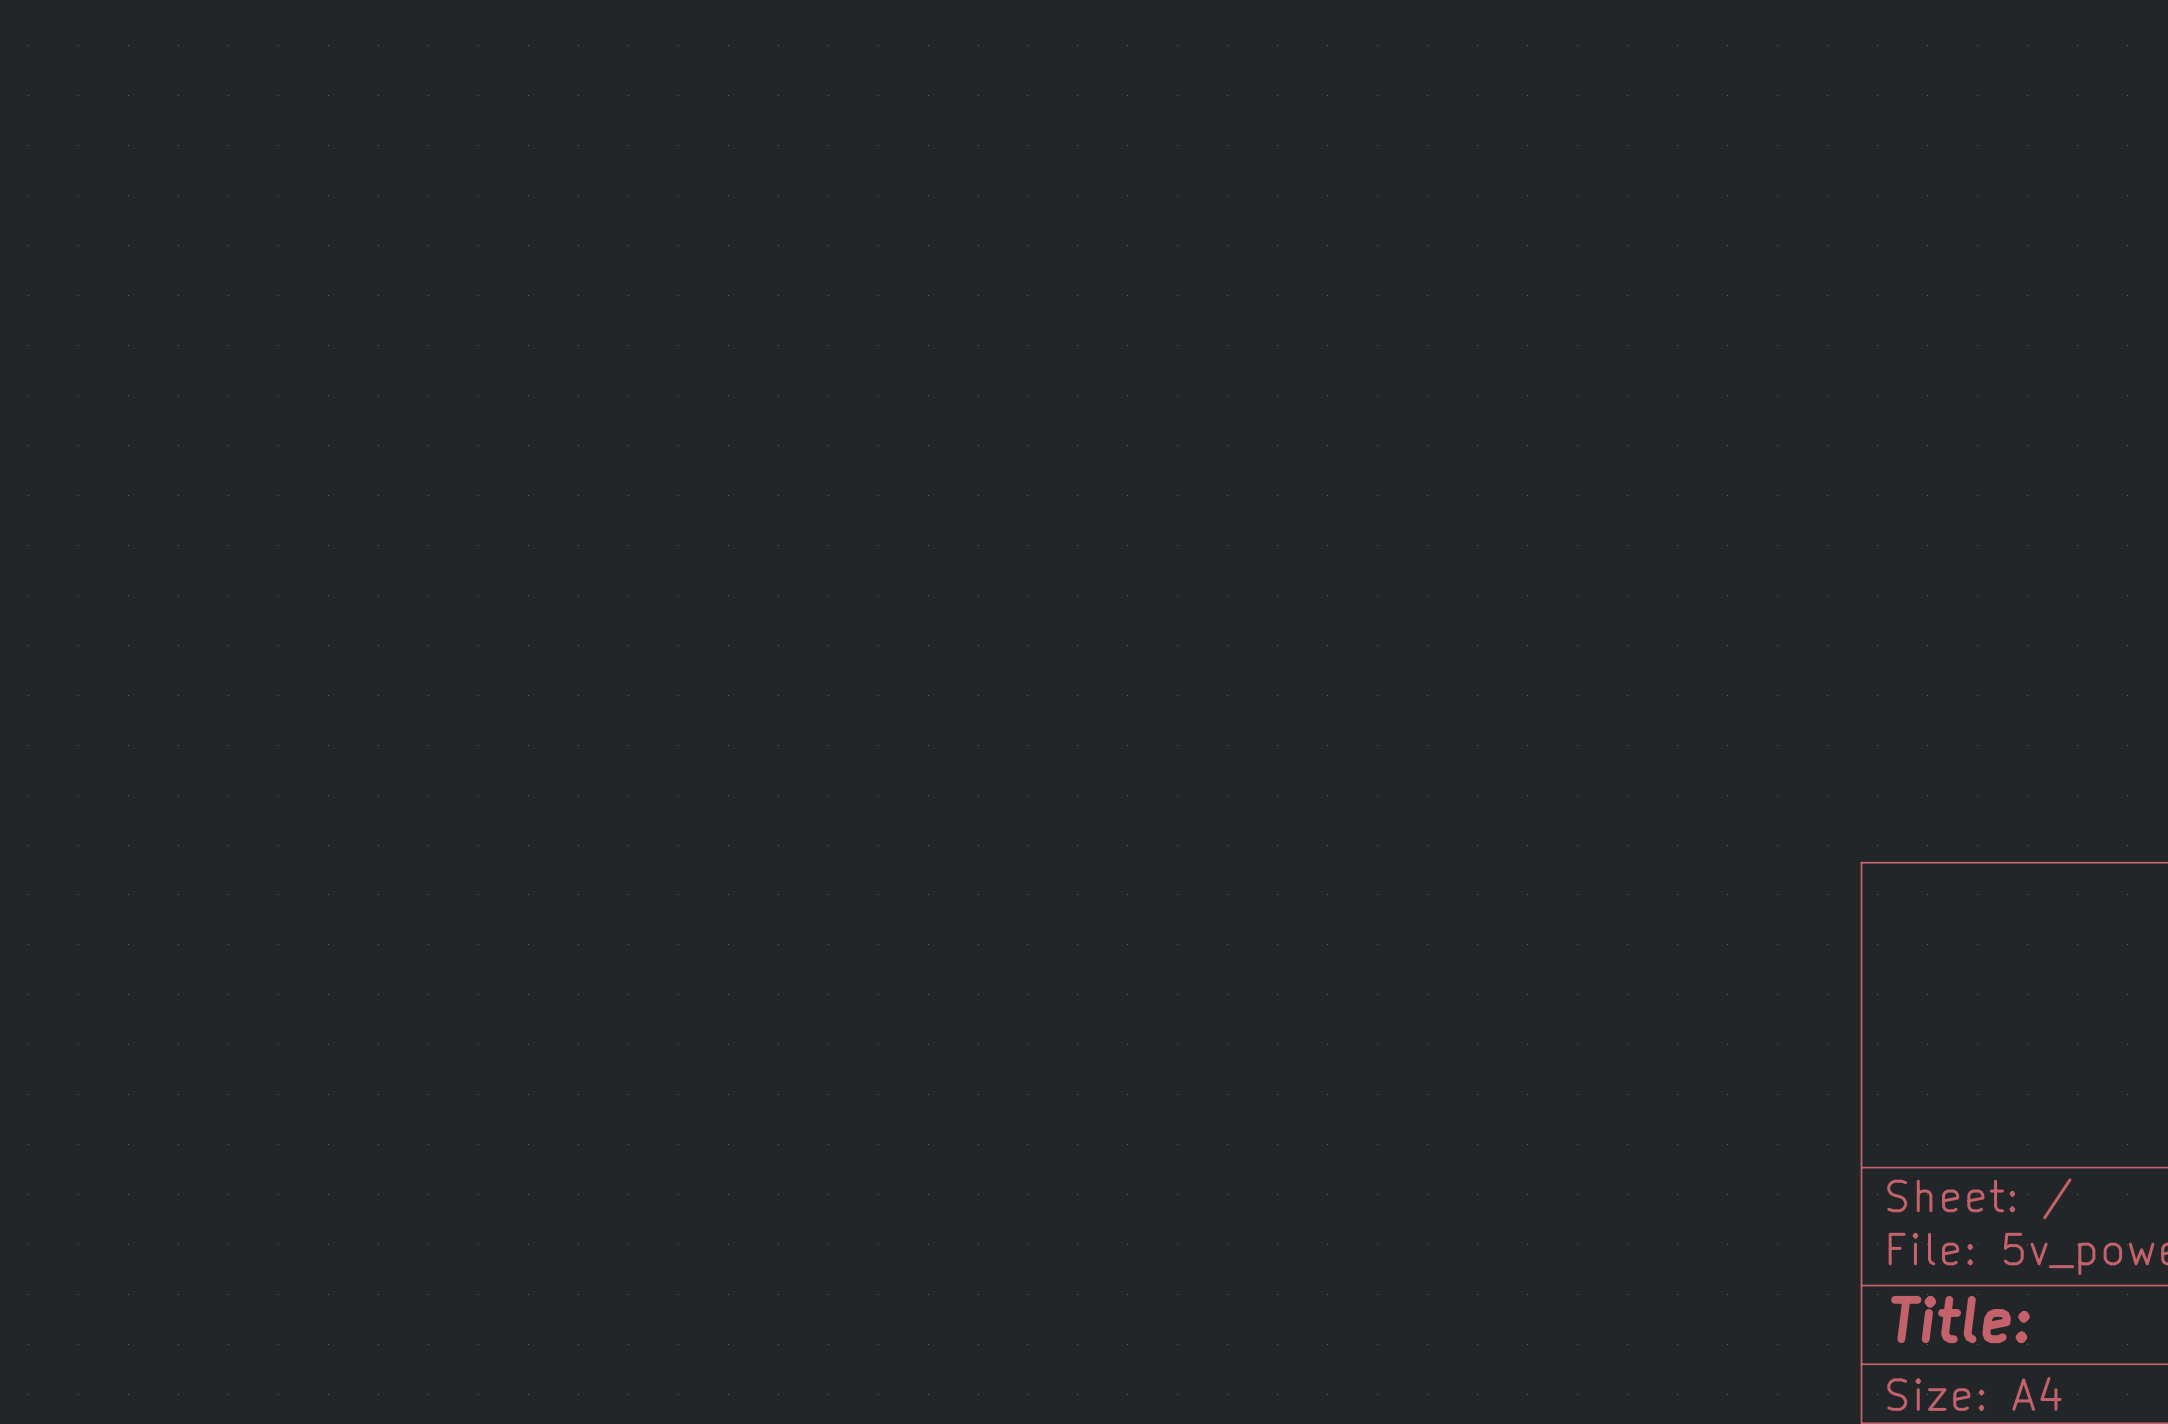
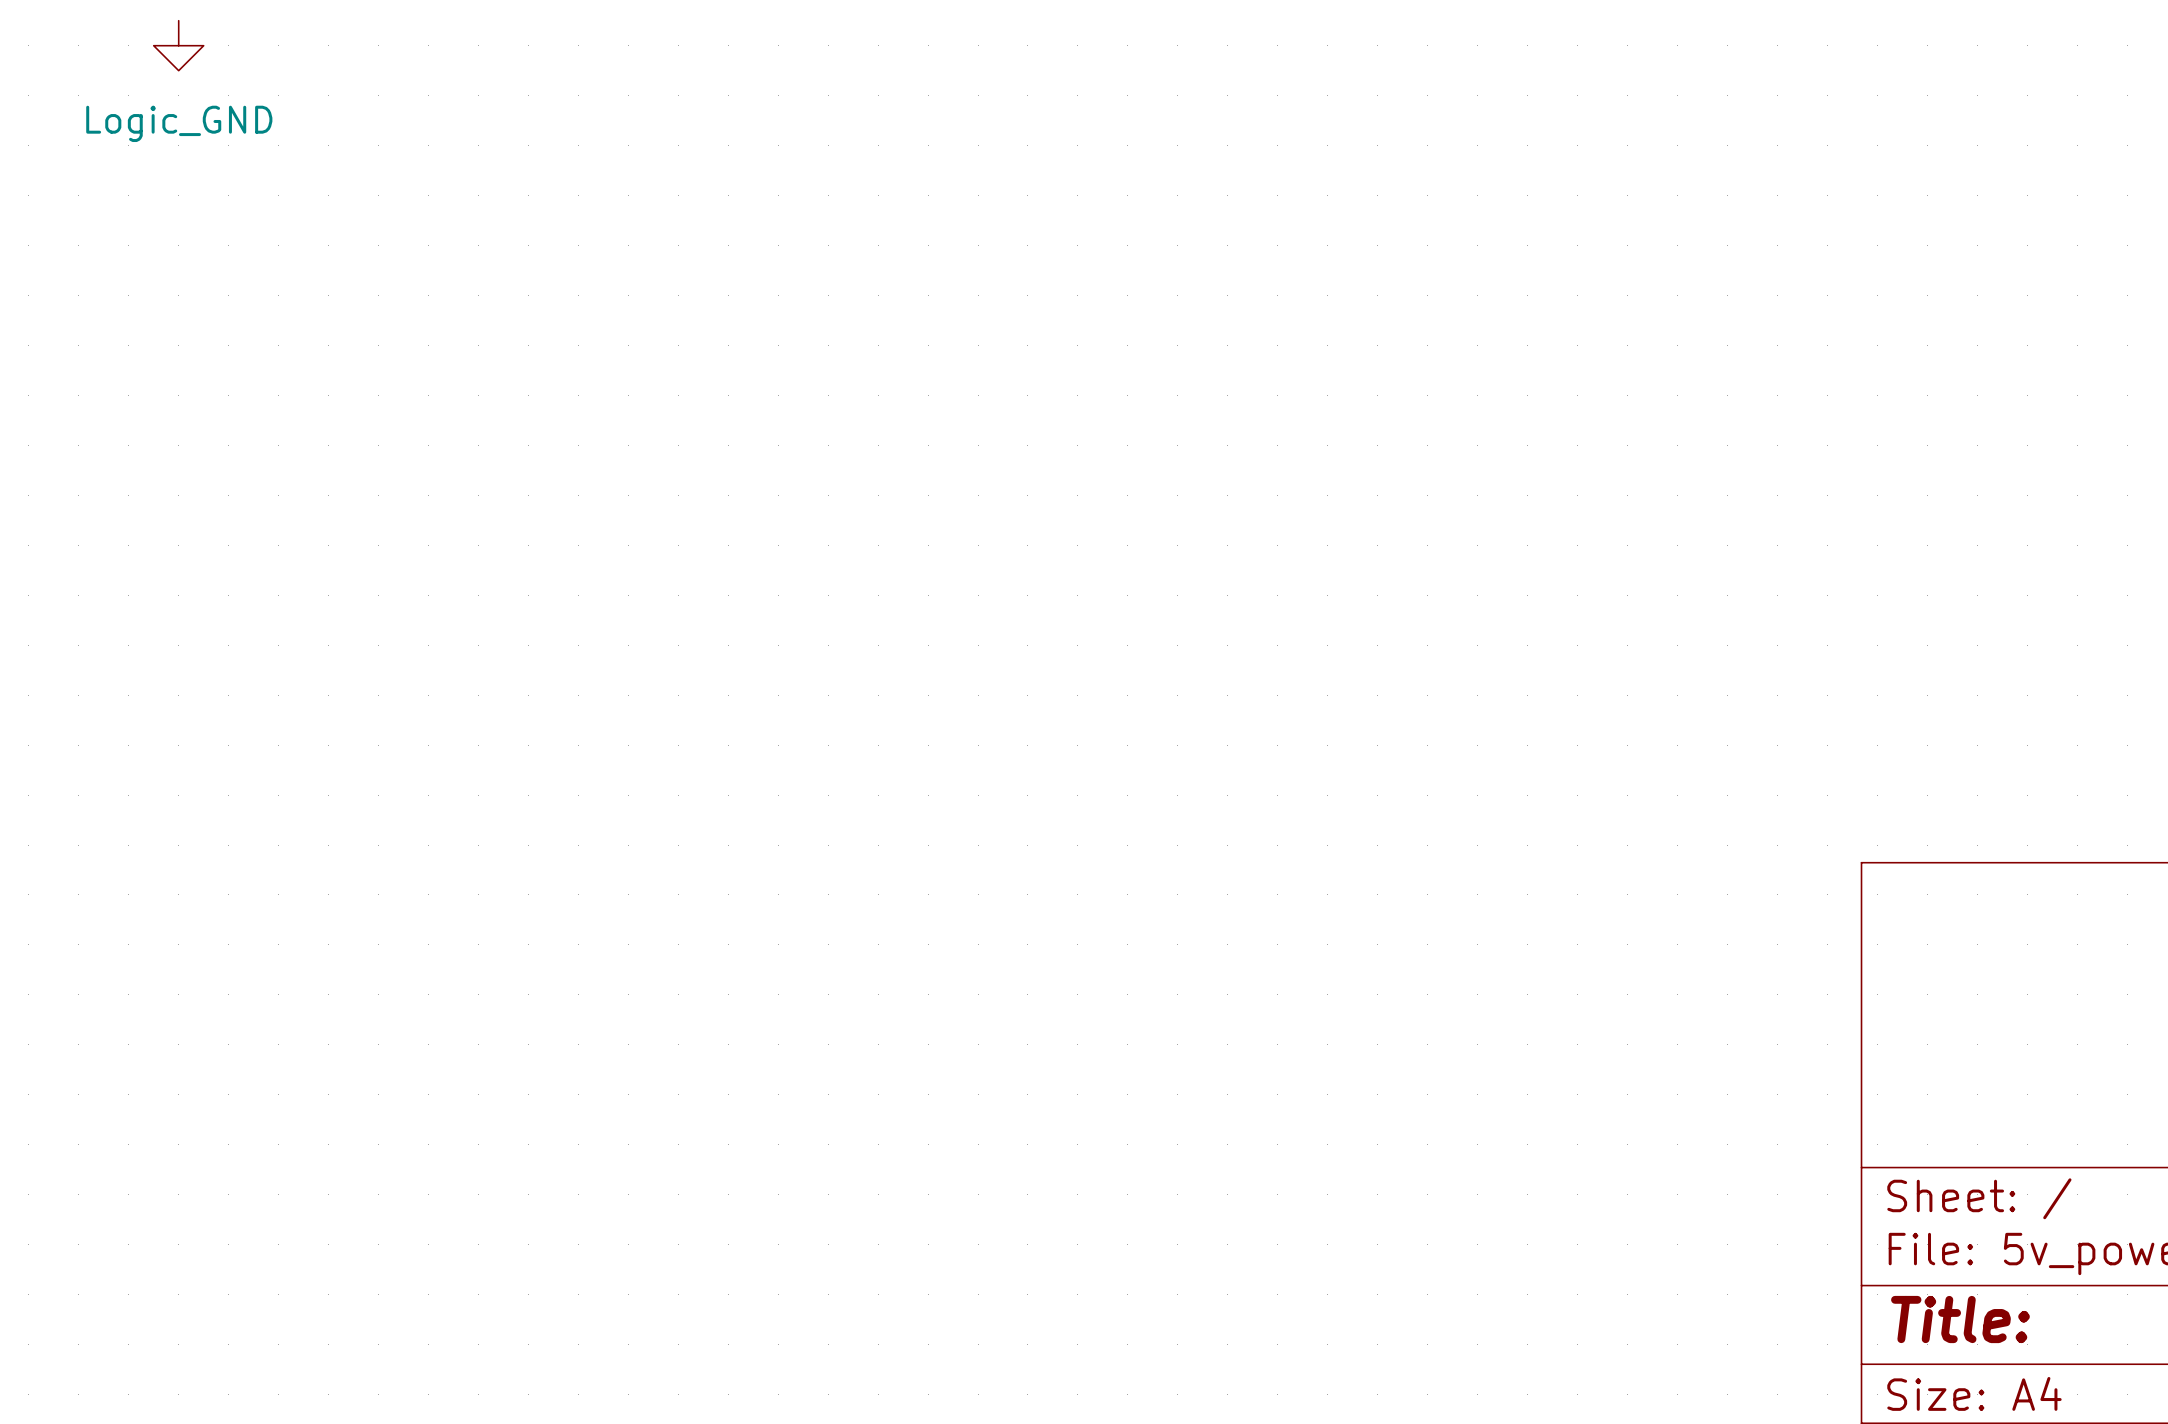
power symbol: none -> Logic_GND (178, 45)

